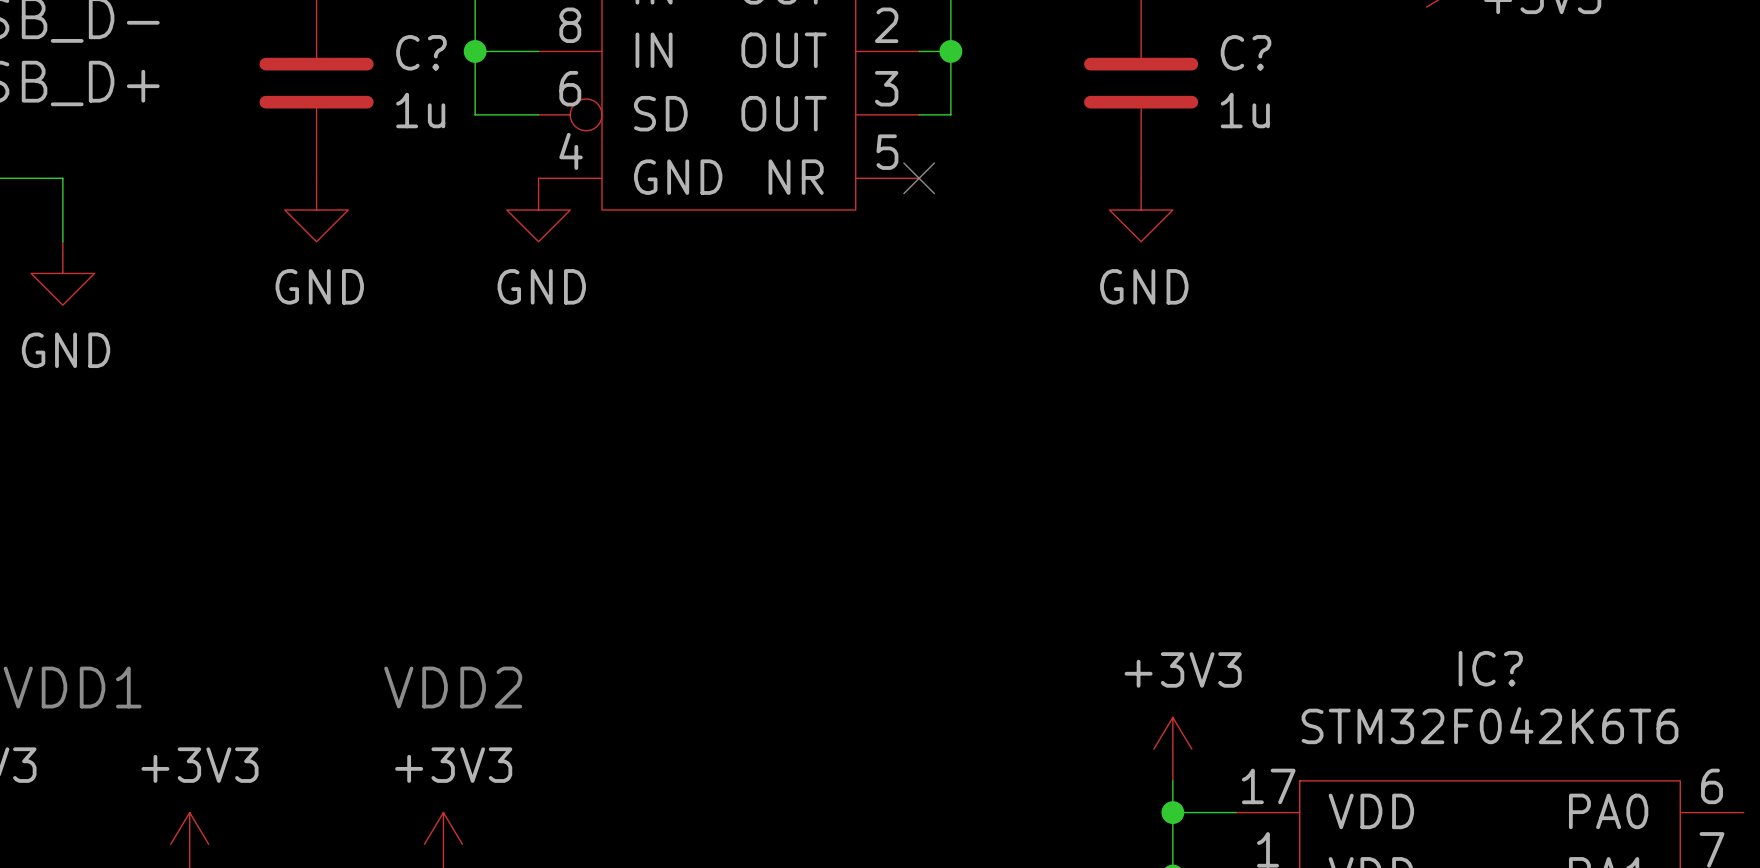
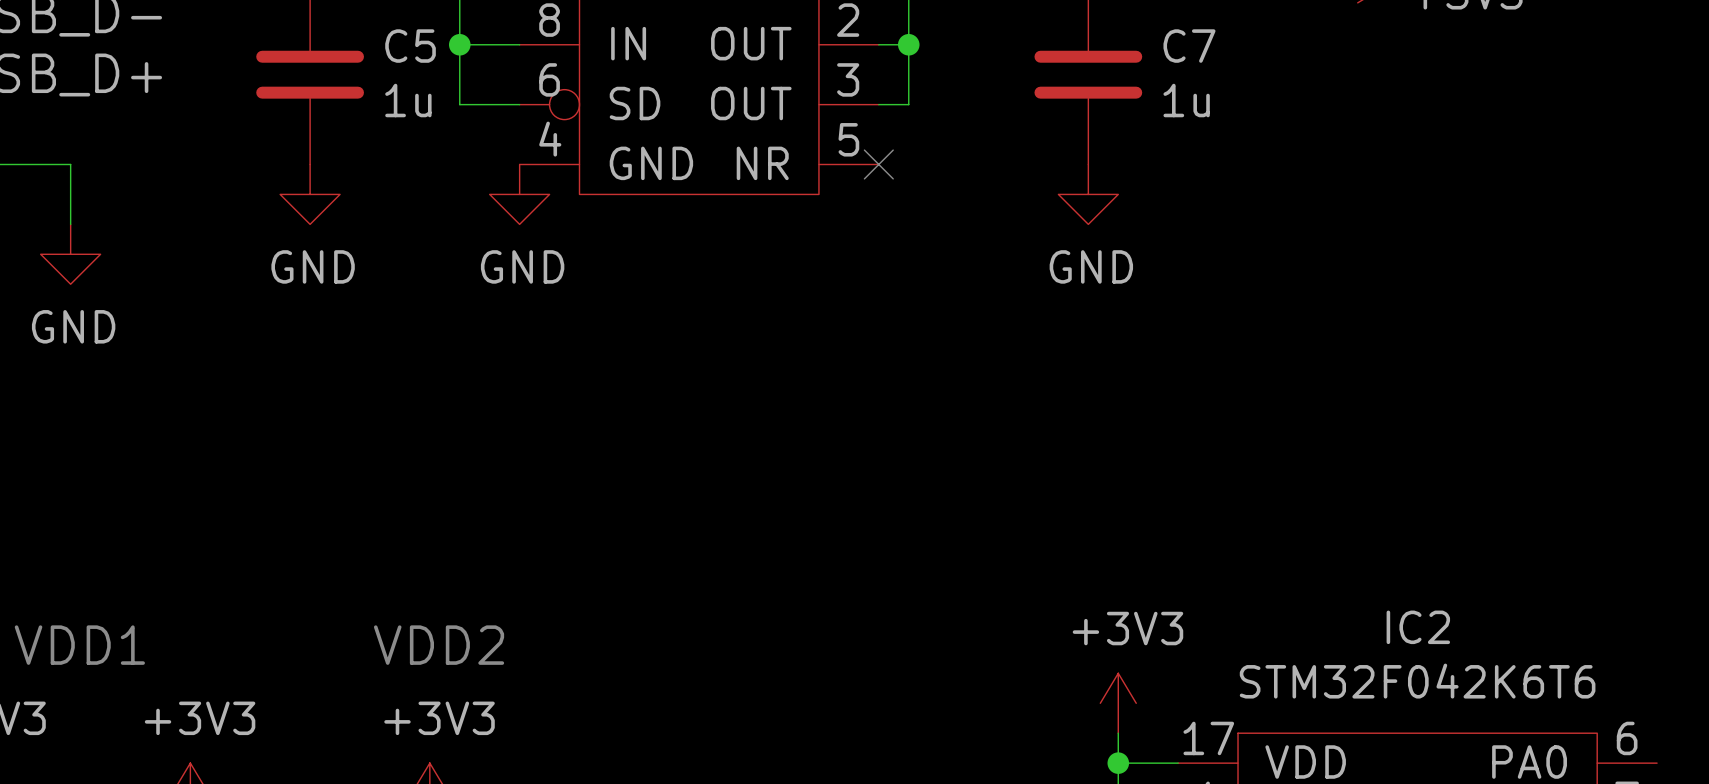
C? name: C? (421, 52) -> C5 (410, 46)
C? name: C? (1246, 52) -> C7 (1189, 46)
IC? name: IC? (1490, 668) -> IC2 (1418, 627)

